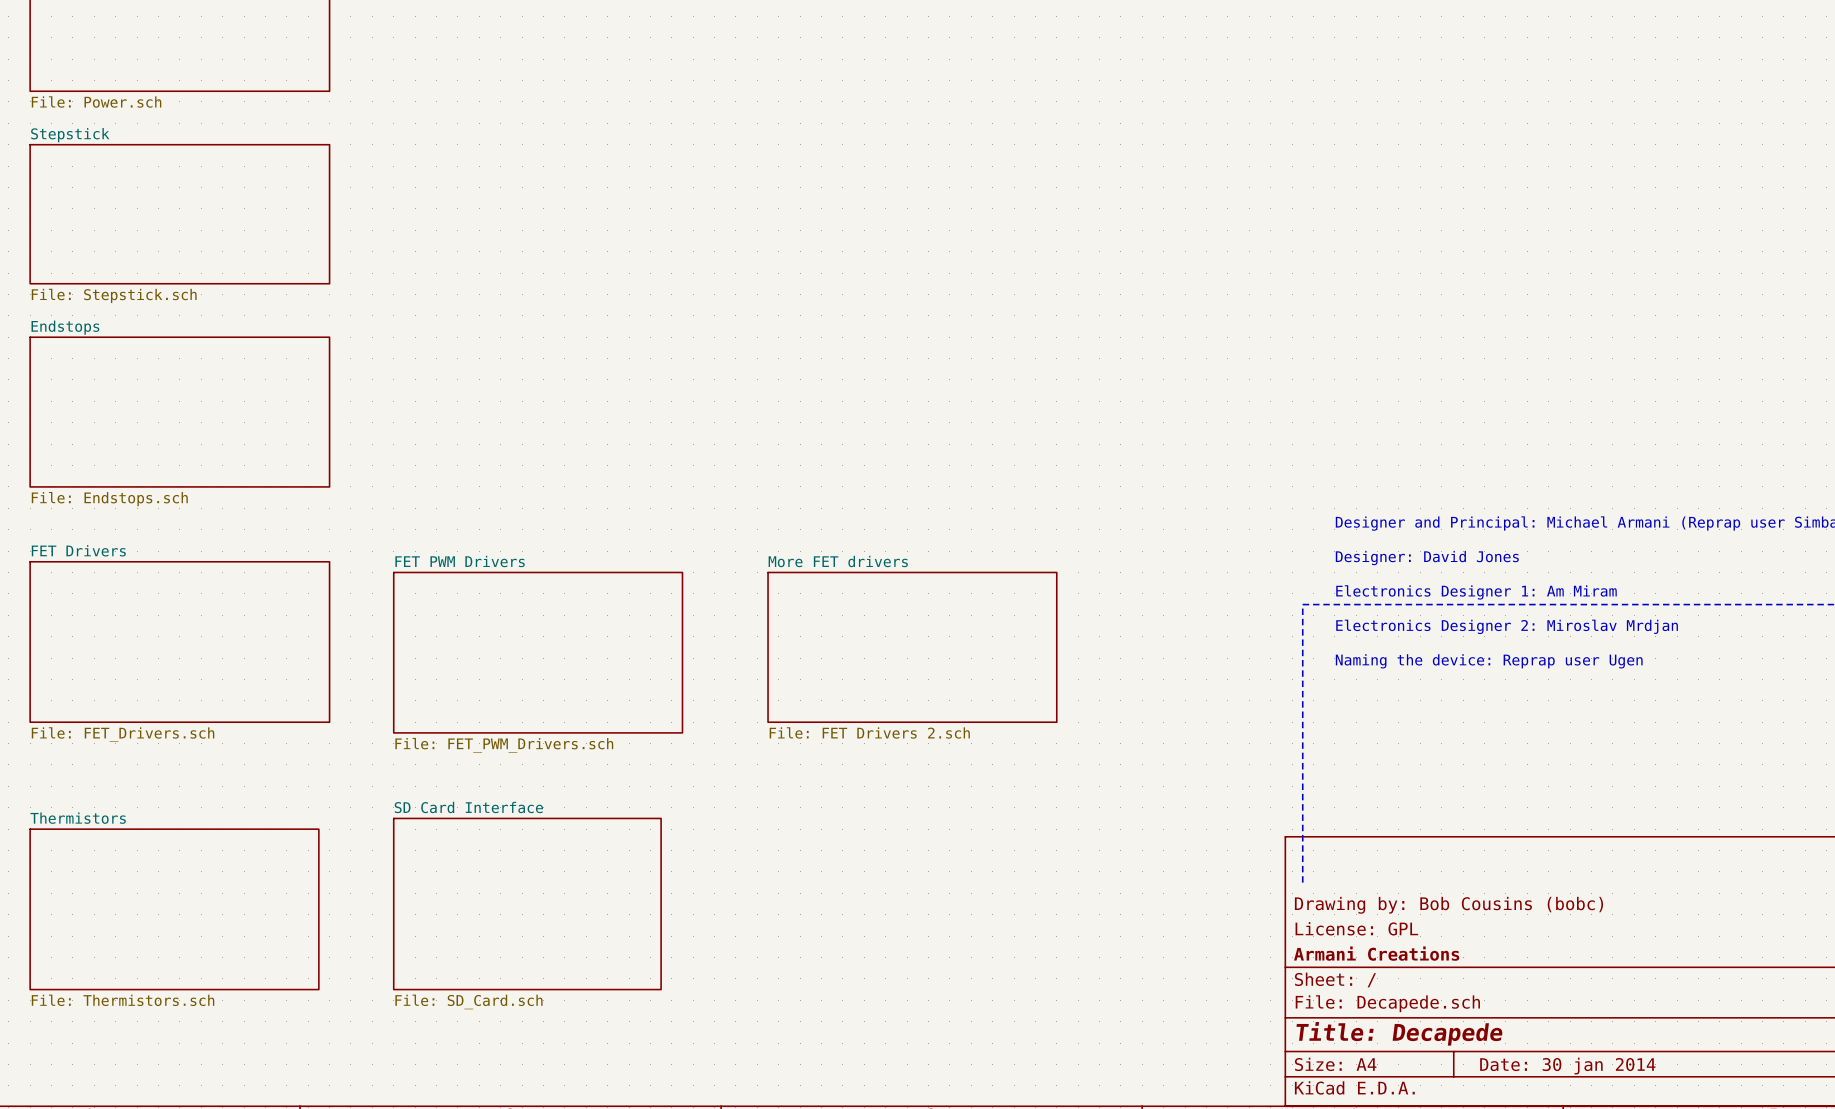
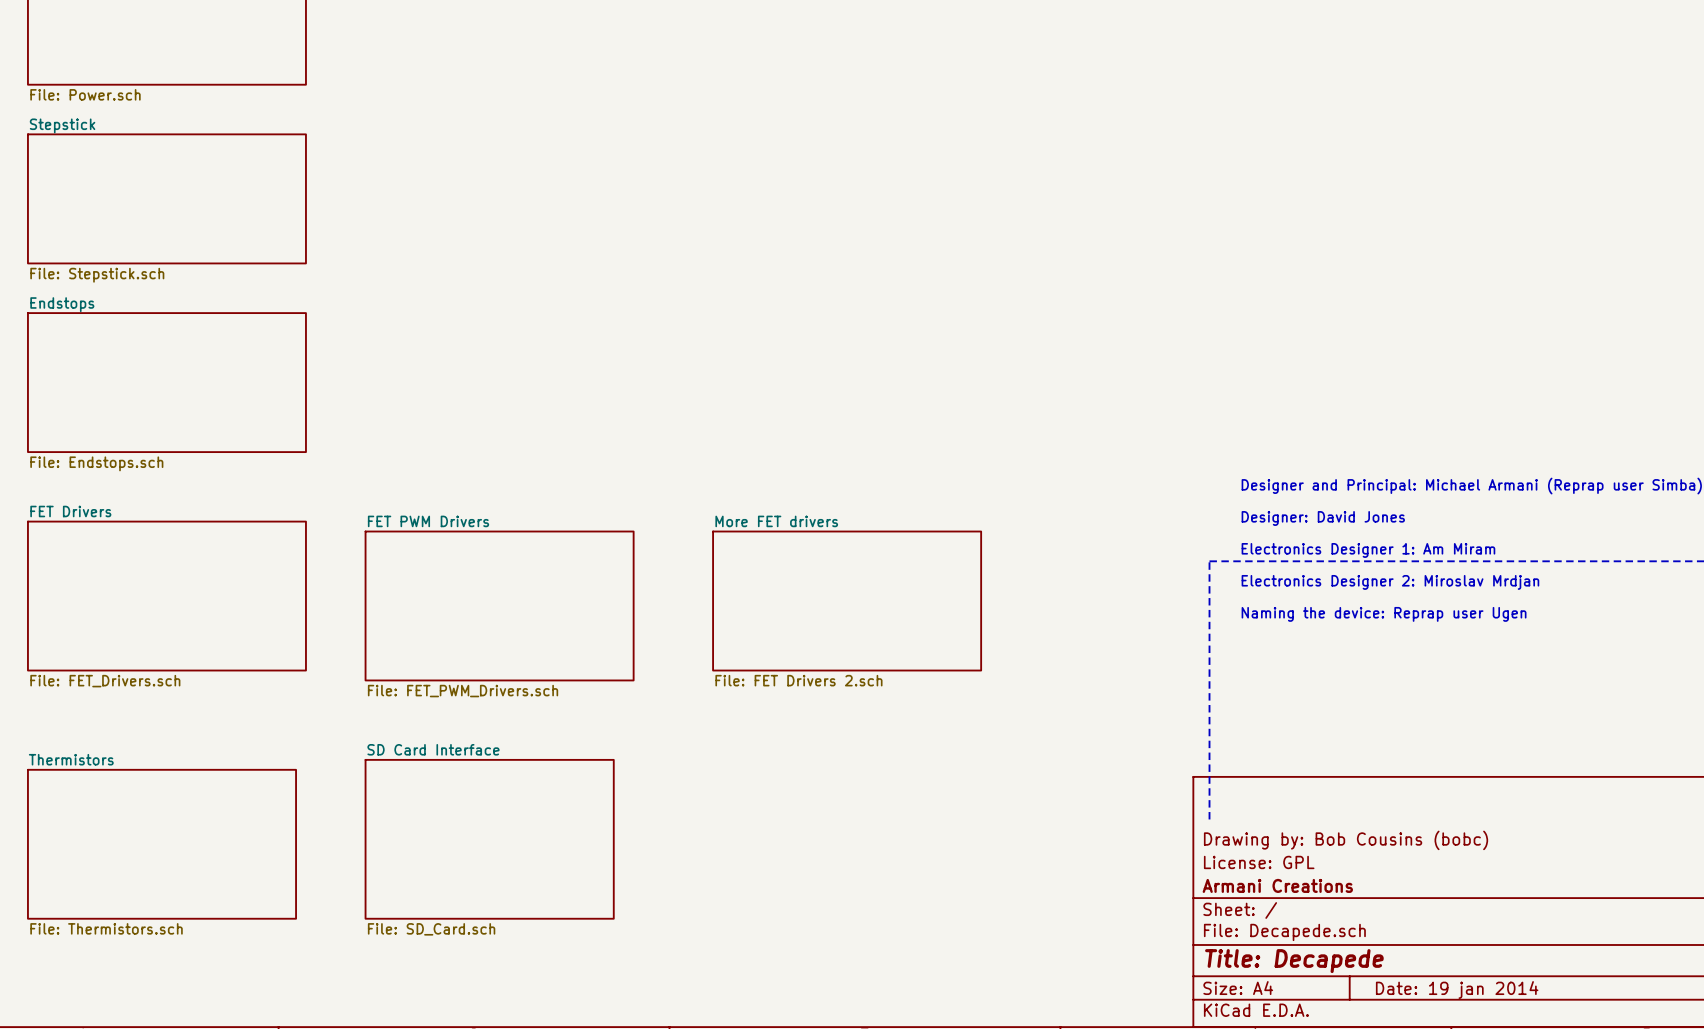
title block: Date: 30 jan 2014 (1567, 1066) -> Date: 19 jan 2014 (1457, 990)

